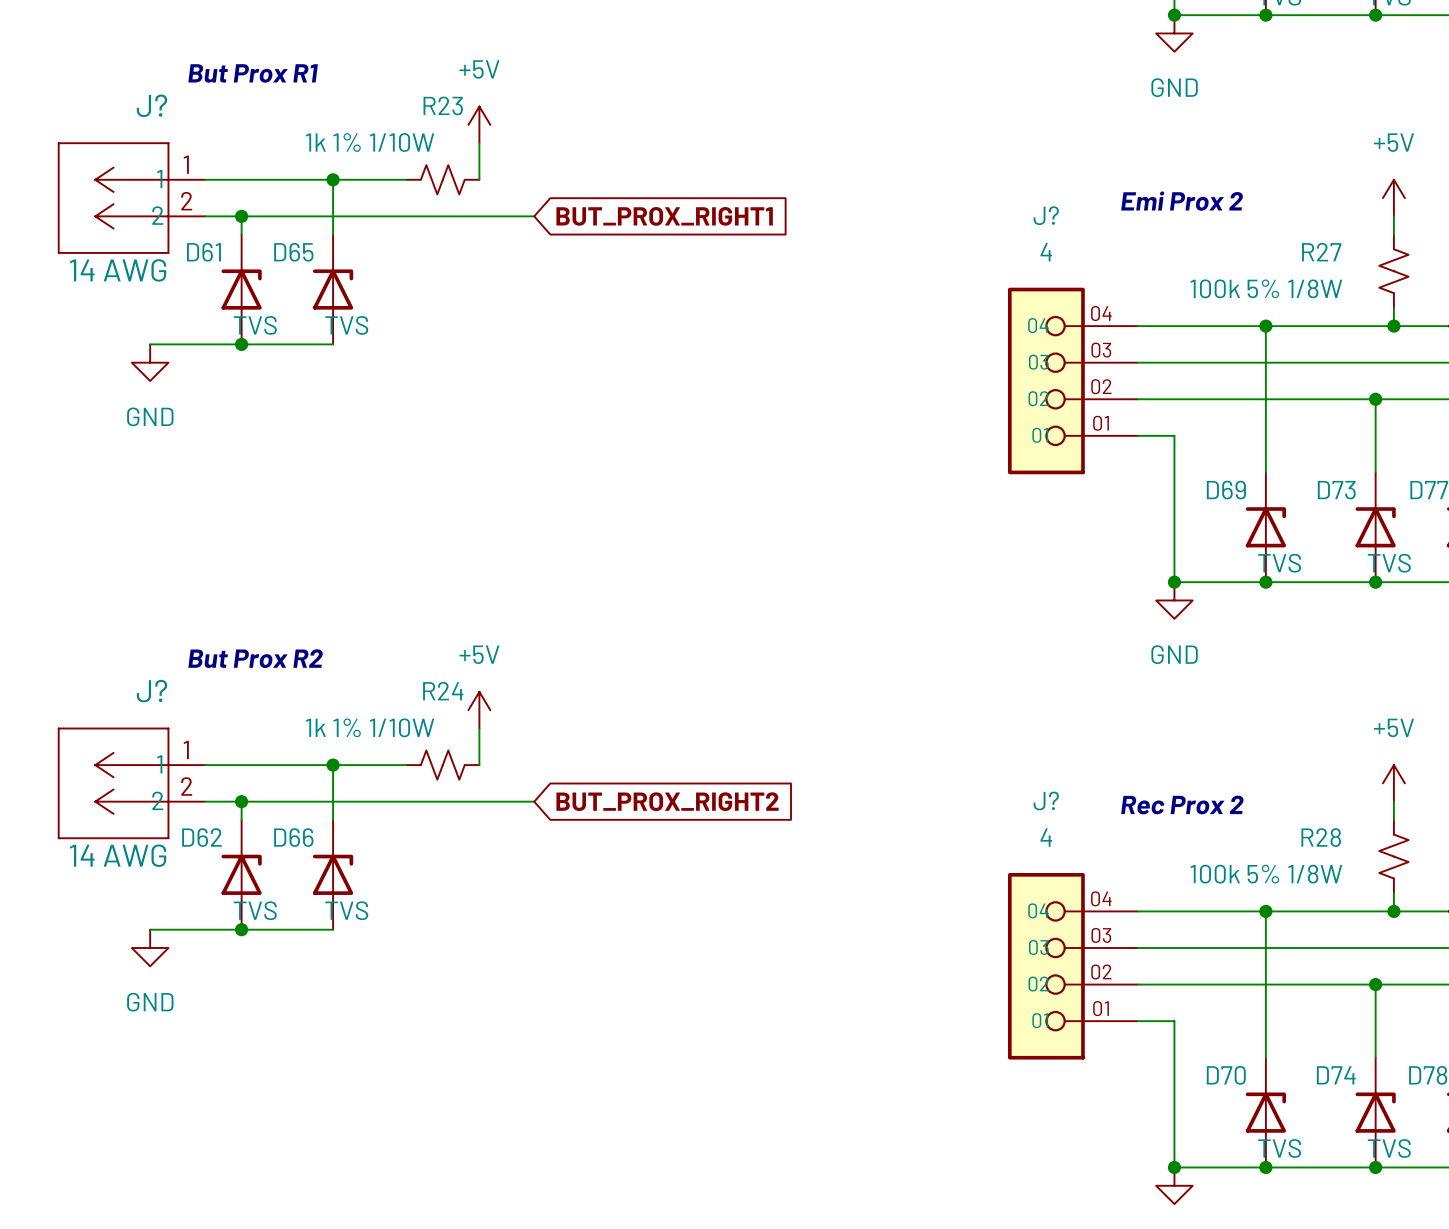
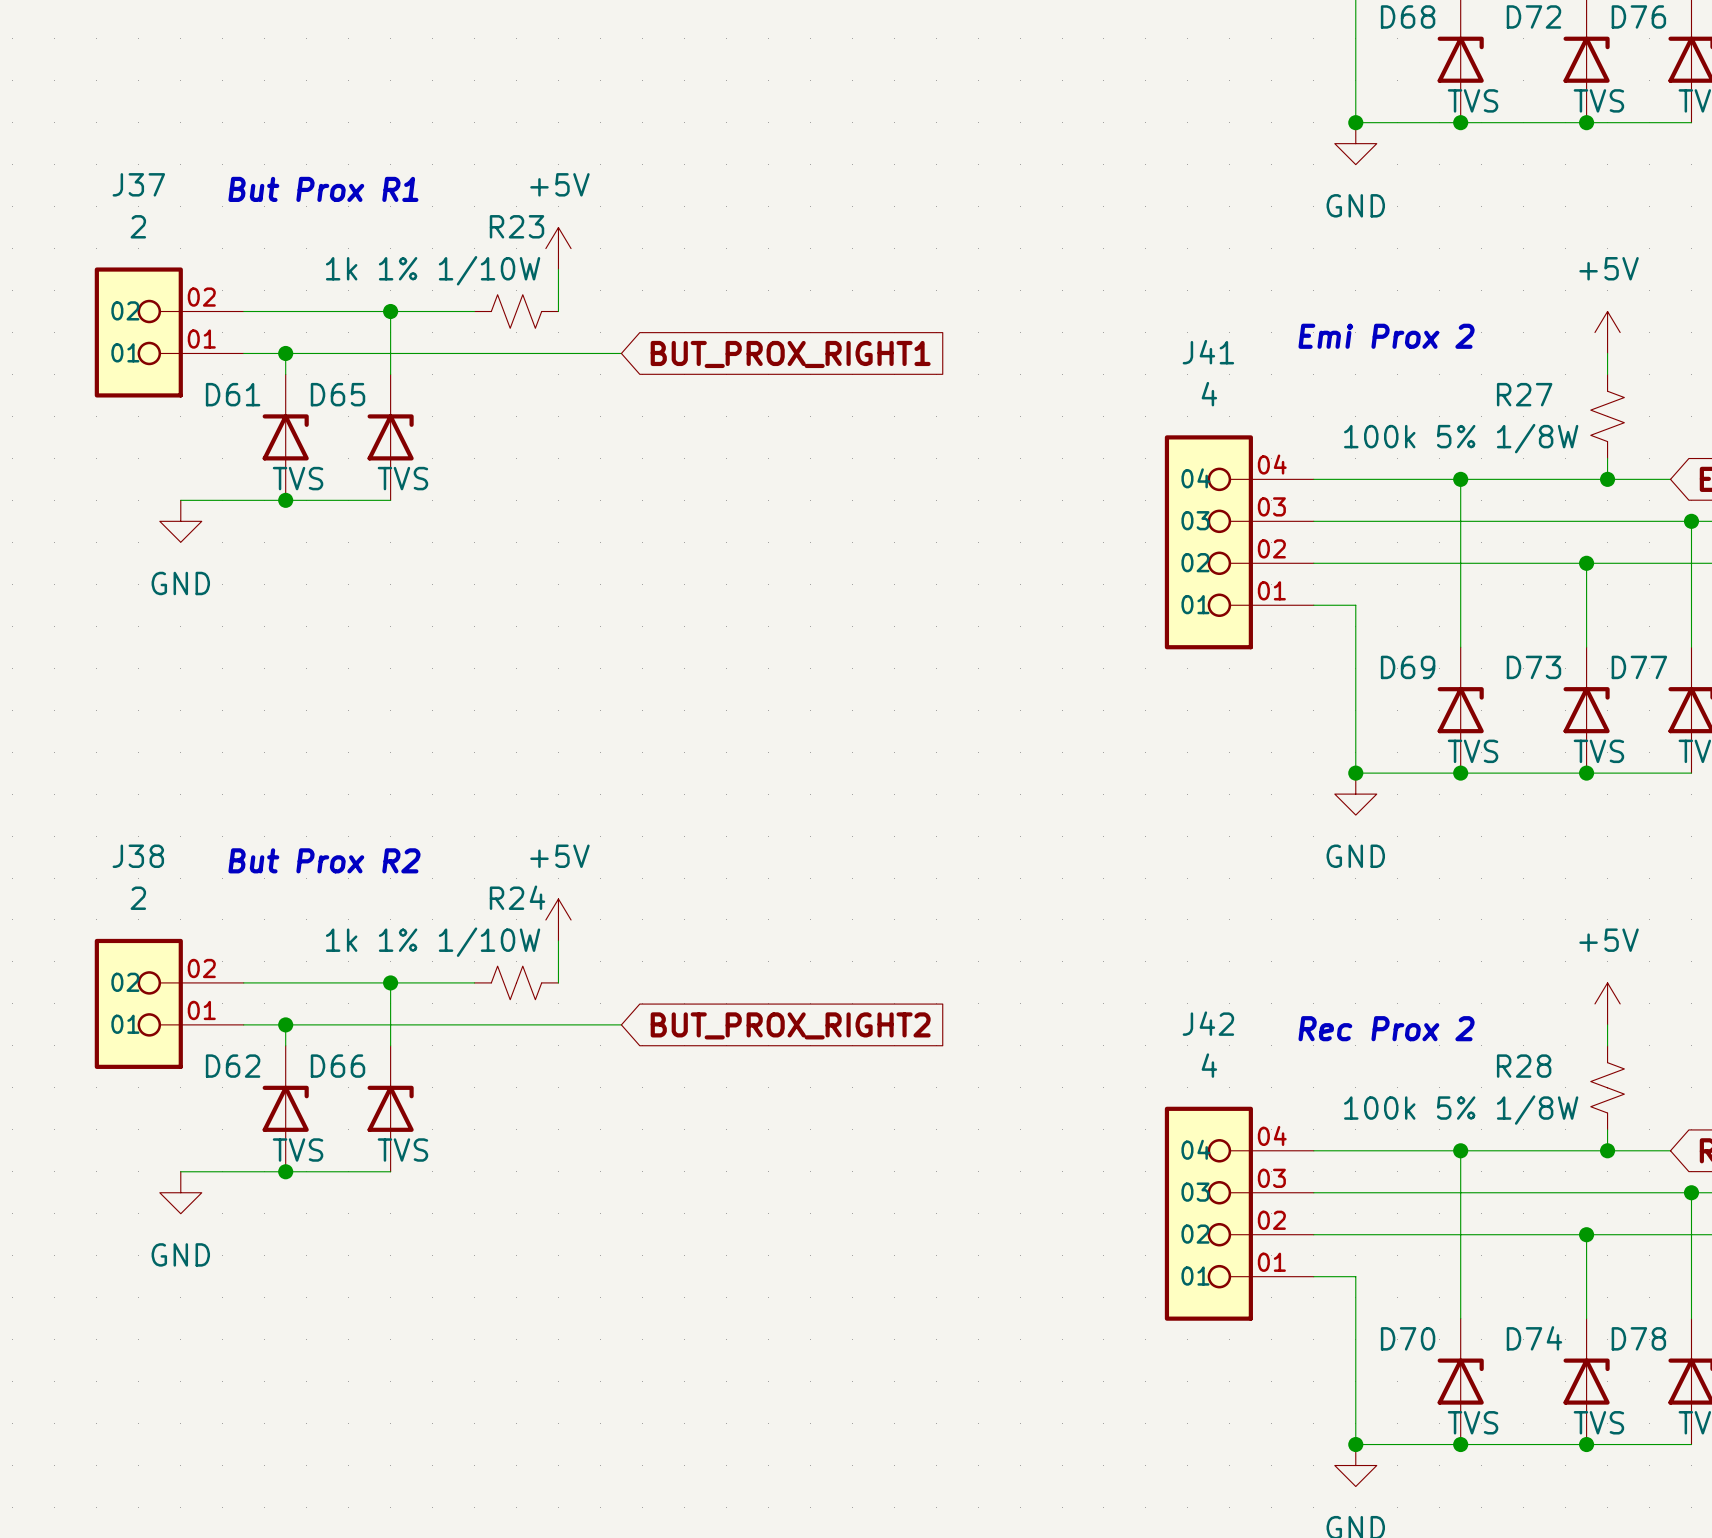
J?: 14 AWG (131, 198) -> none
J37: none -> 2 (169, 332)
J? name: J? (1046, 215) -> J41 (1208, 352)
J?: 14 AWG (131, 783) -> none
J38: none -> 2 (169, 1003)
J? name: J? (1046, 800) -> J42 (1208, 1023)

